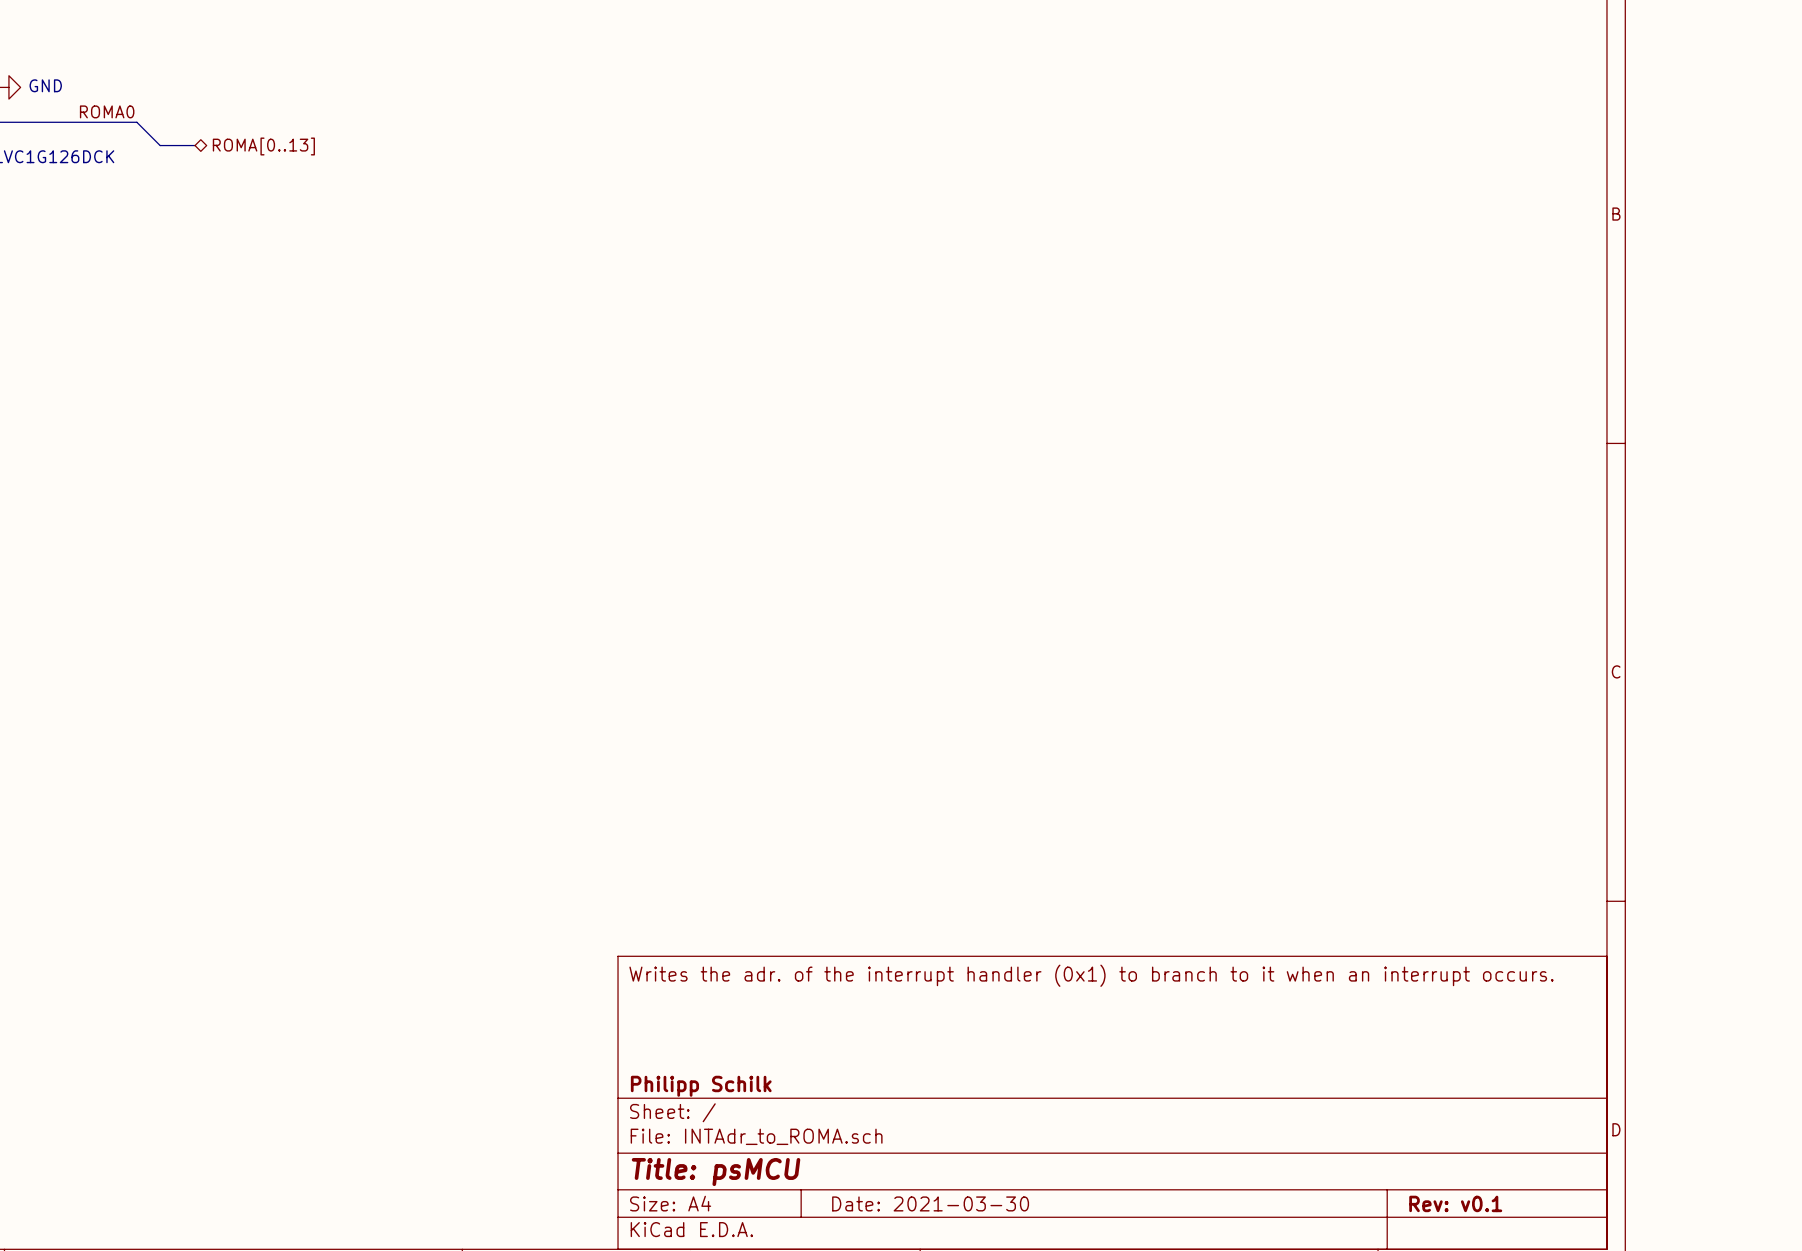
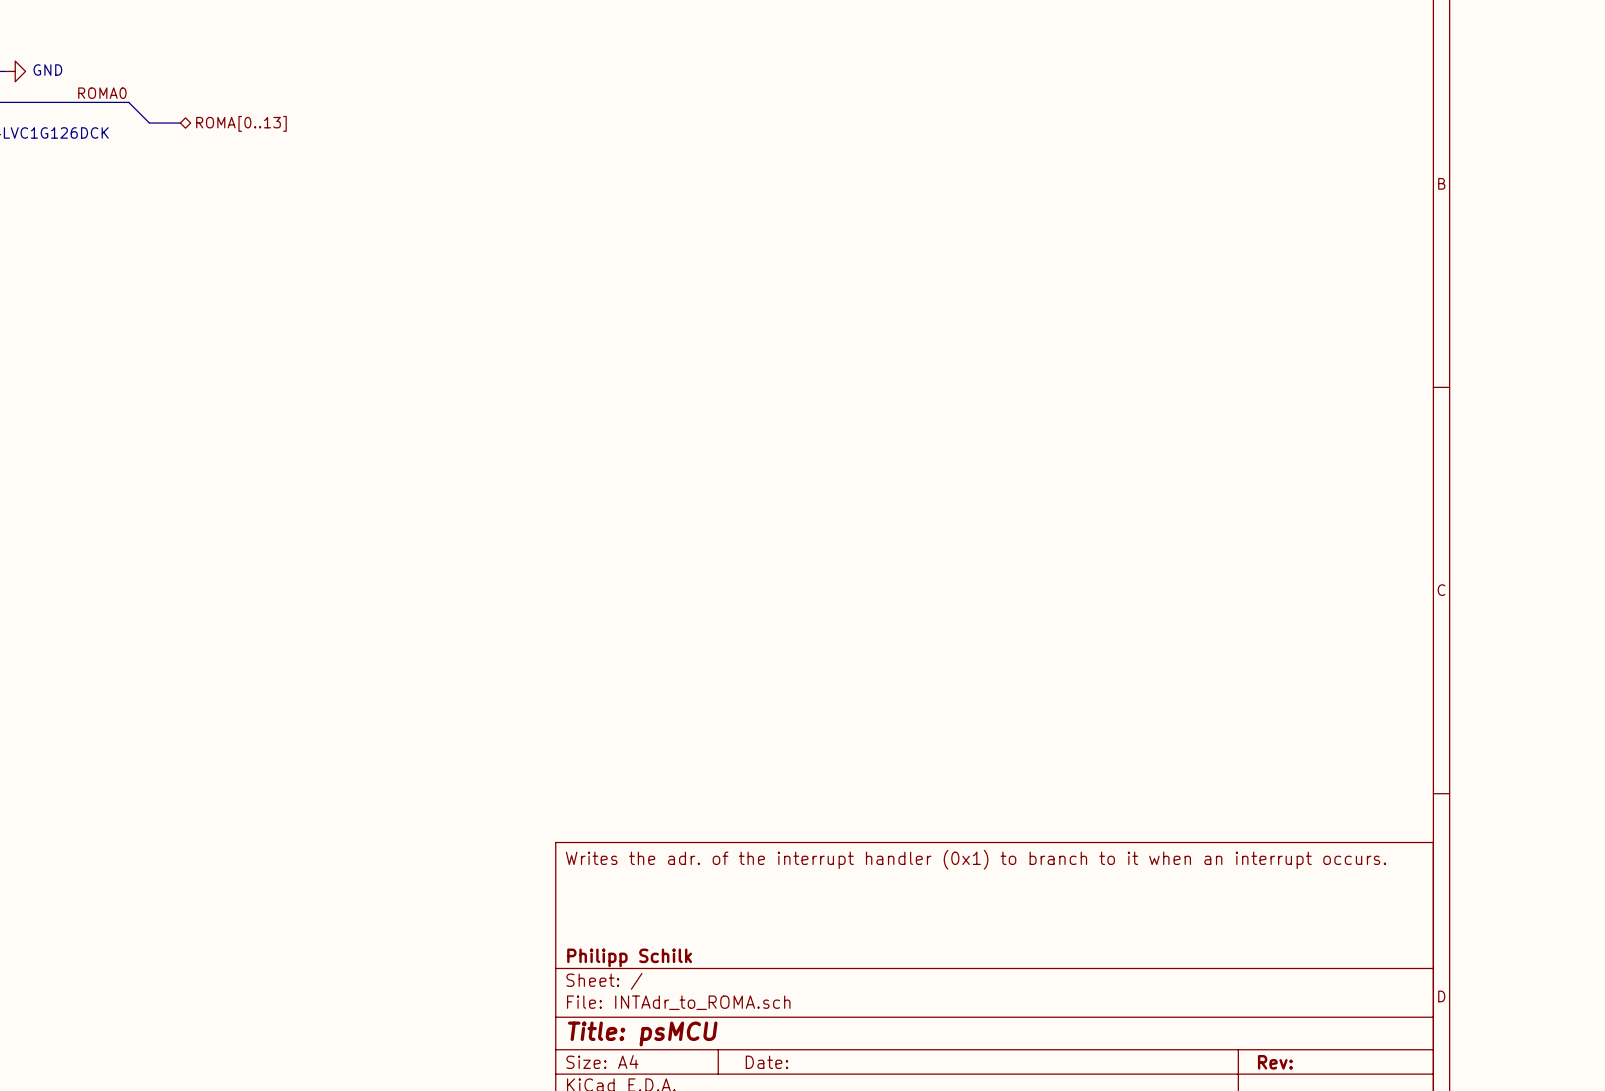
title block: Date: 2021-03-30 (930, 1203) -> Date: (766, 1062)
title block: Rev: v0.1 (1455, 1203) -> Rev: (1275, 1062)

